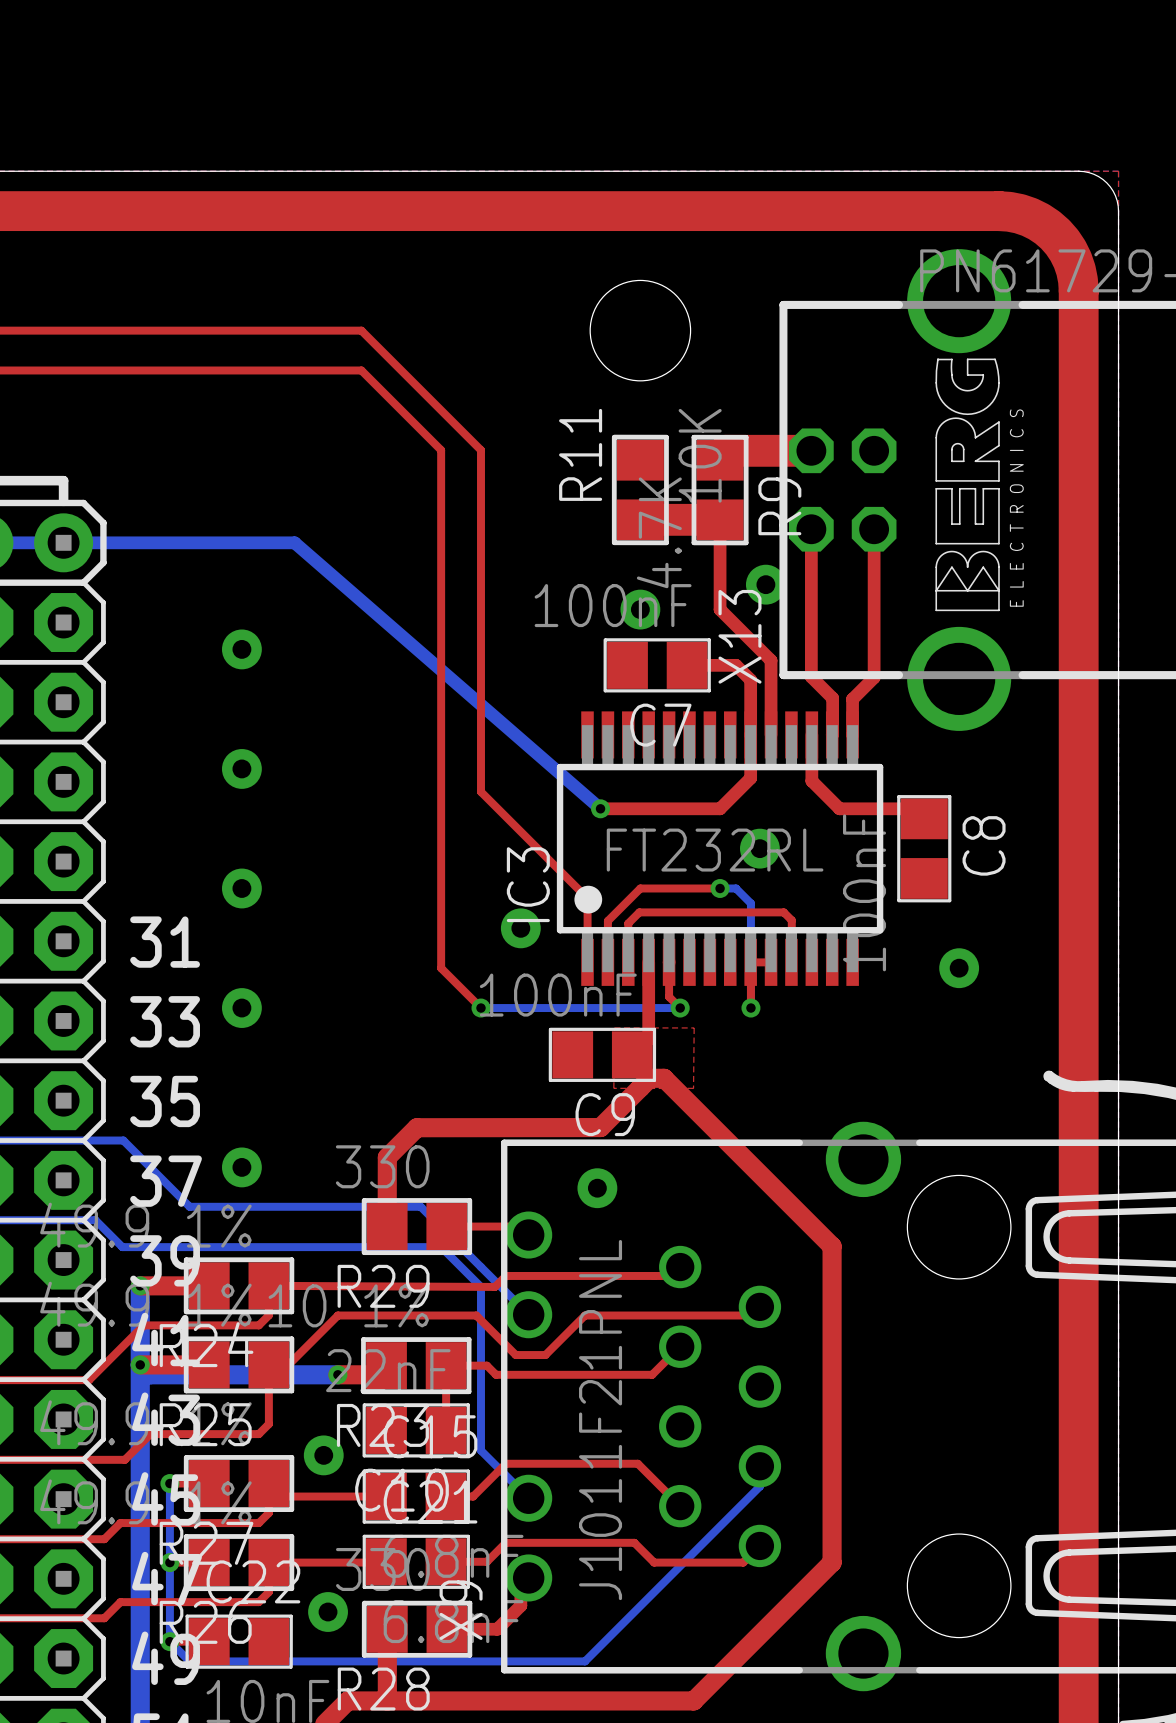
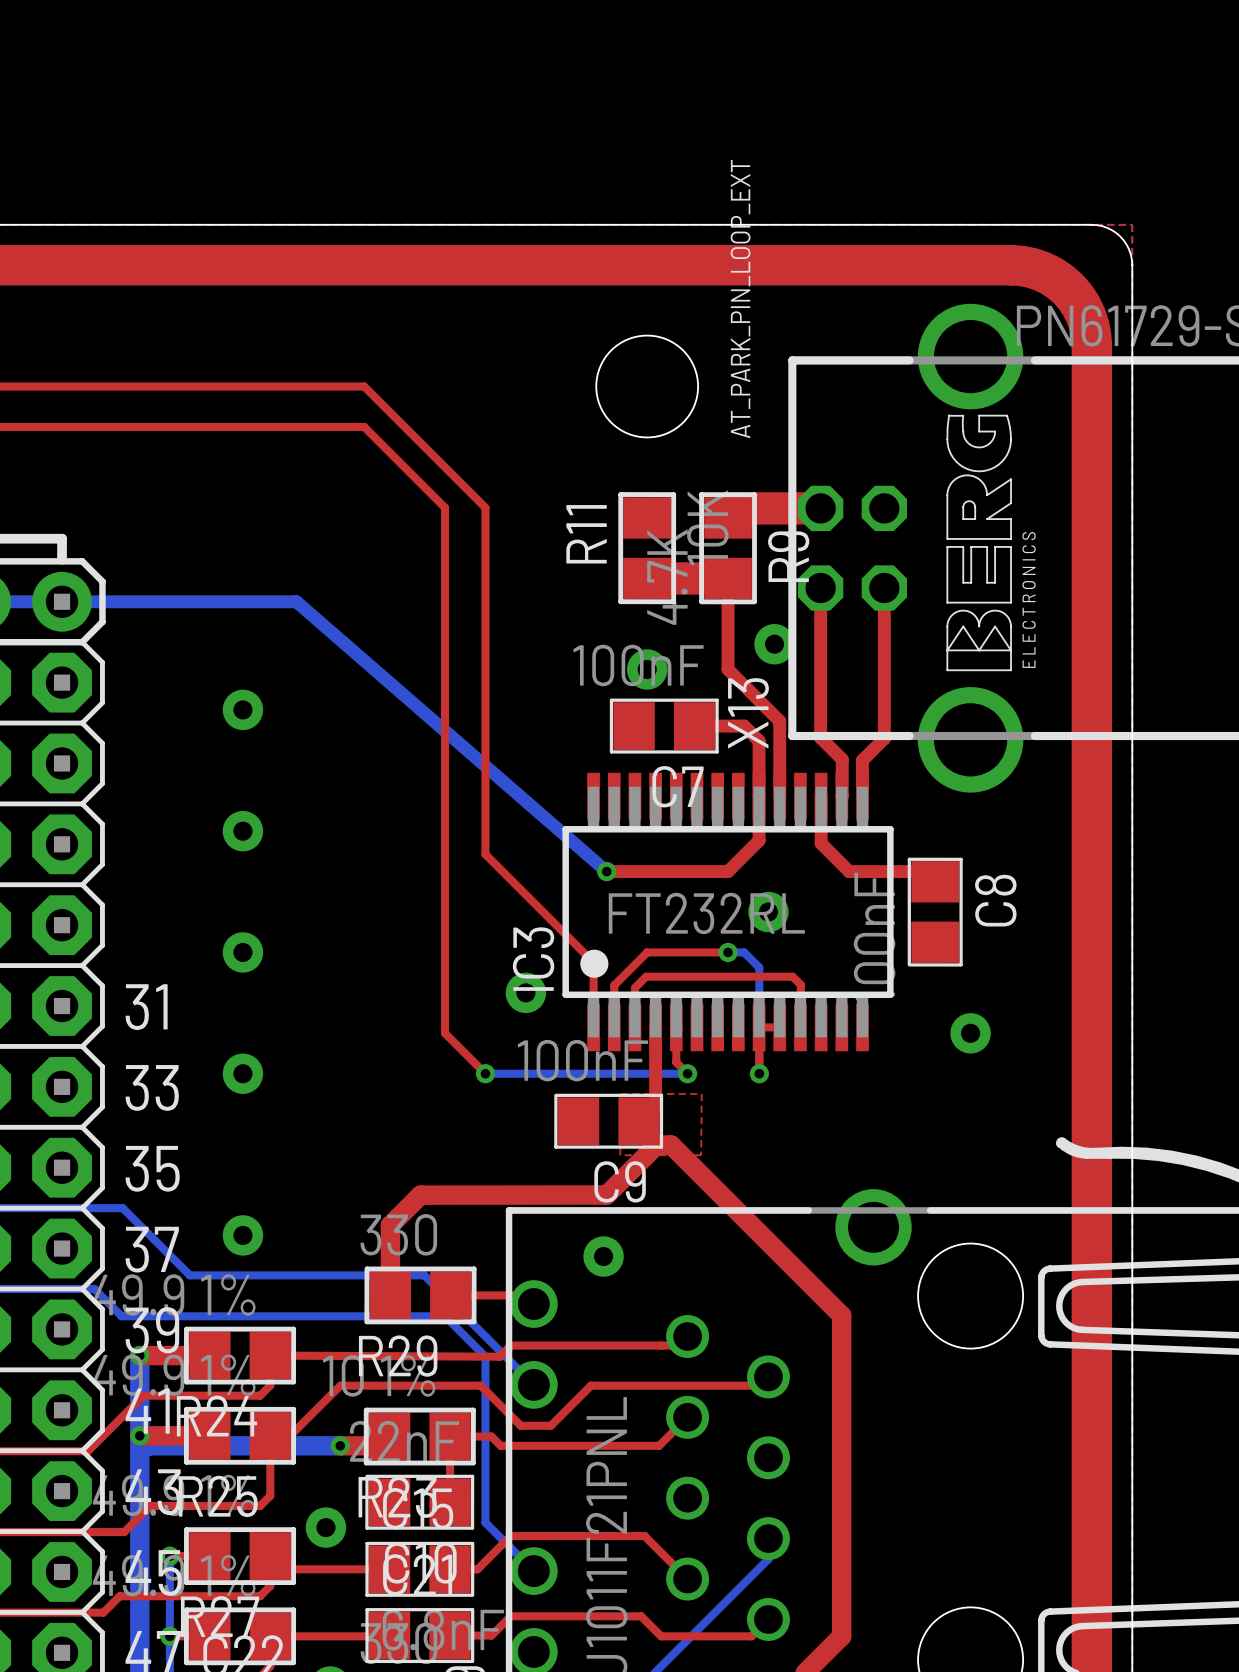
text: none -> AT_PARK_PIN_LOOP_EXT (740, 299)

